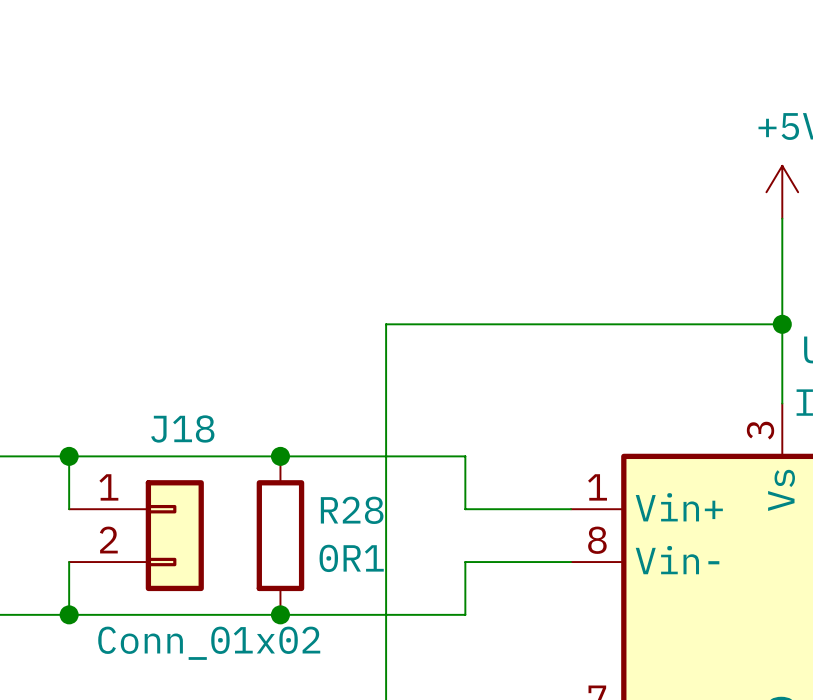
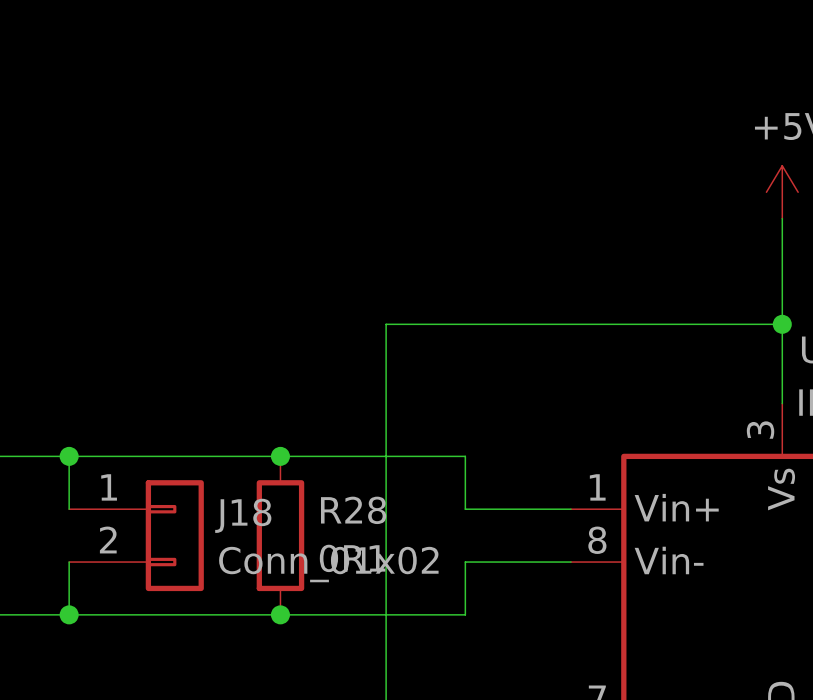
J18 name position: J18 (182, 428) -> J18 (243, 515)
J18 value position: Conn_01x02 (209, 643) -> Conn_01x02 (328, 564)

